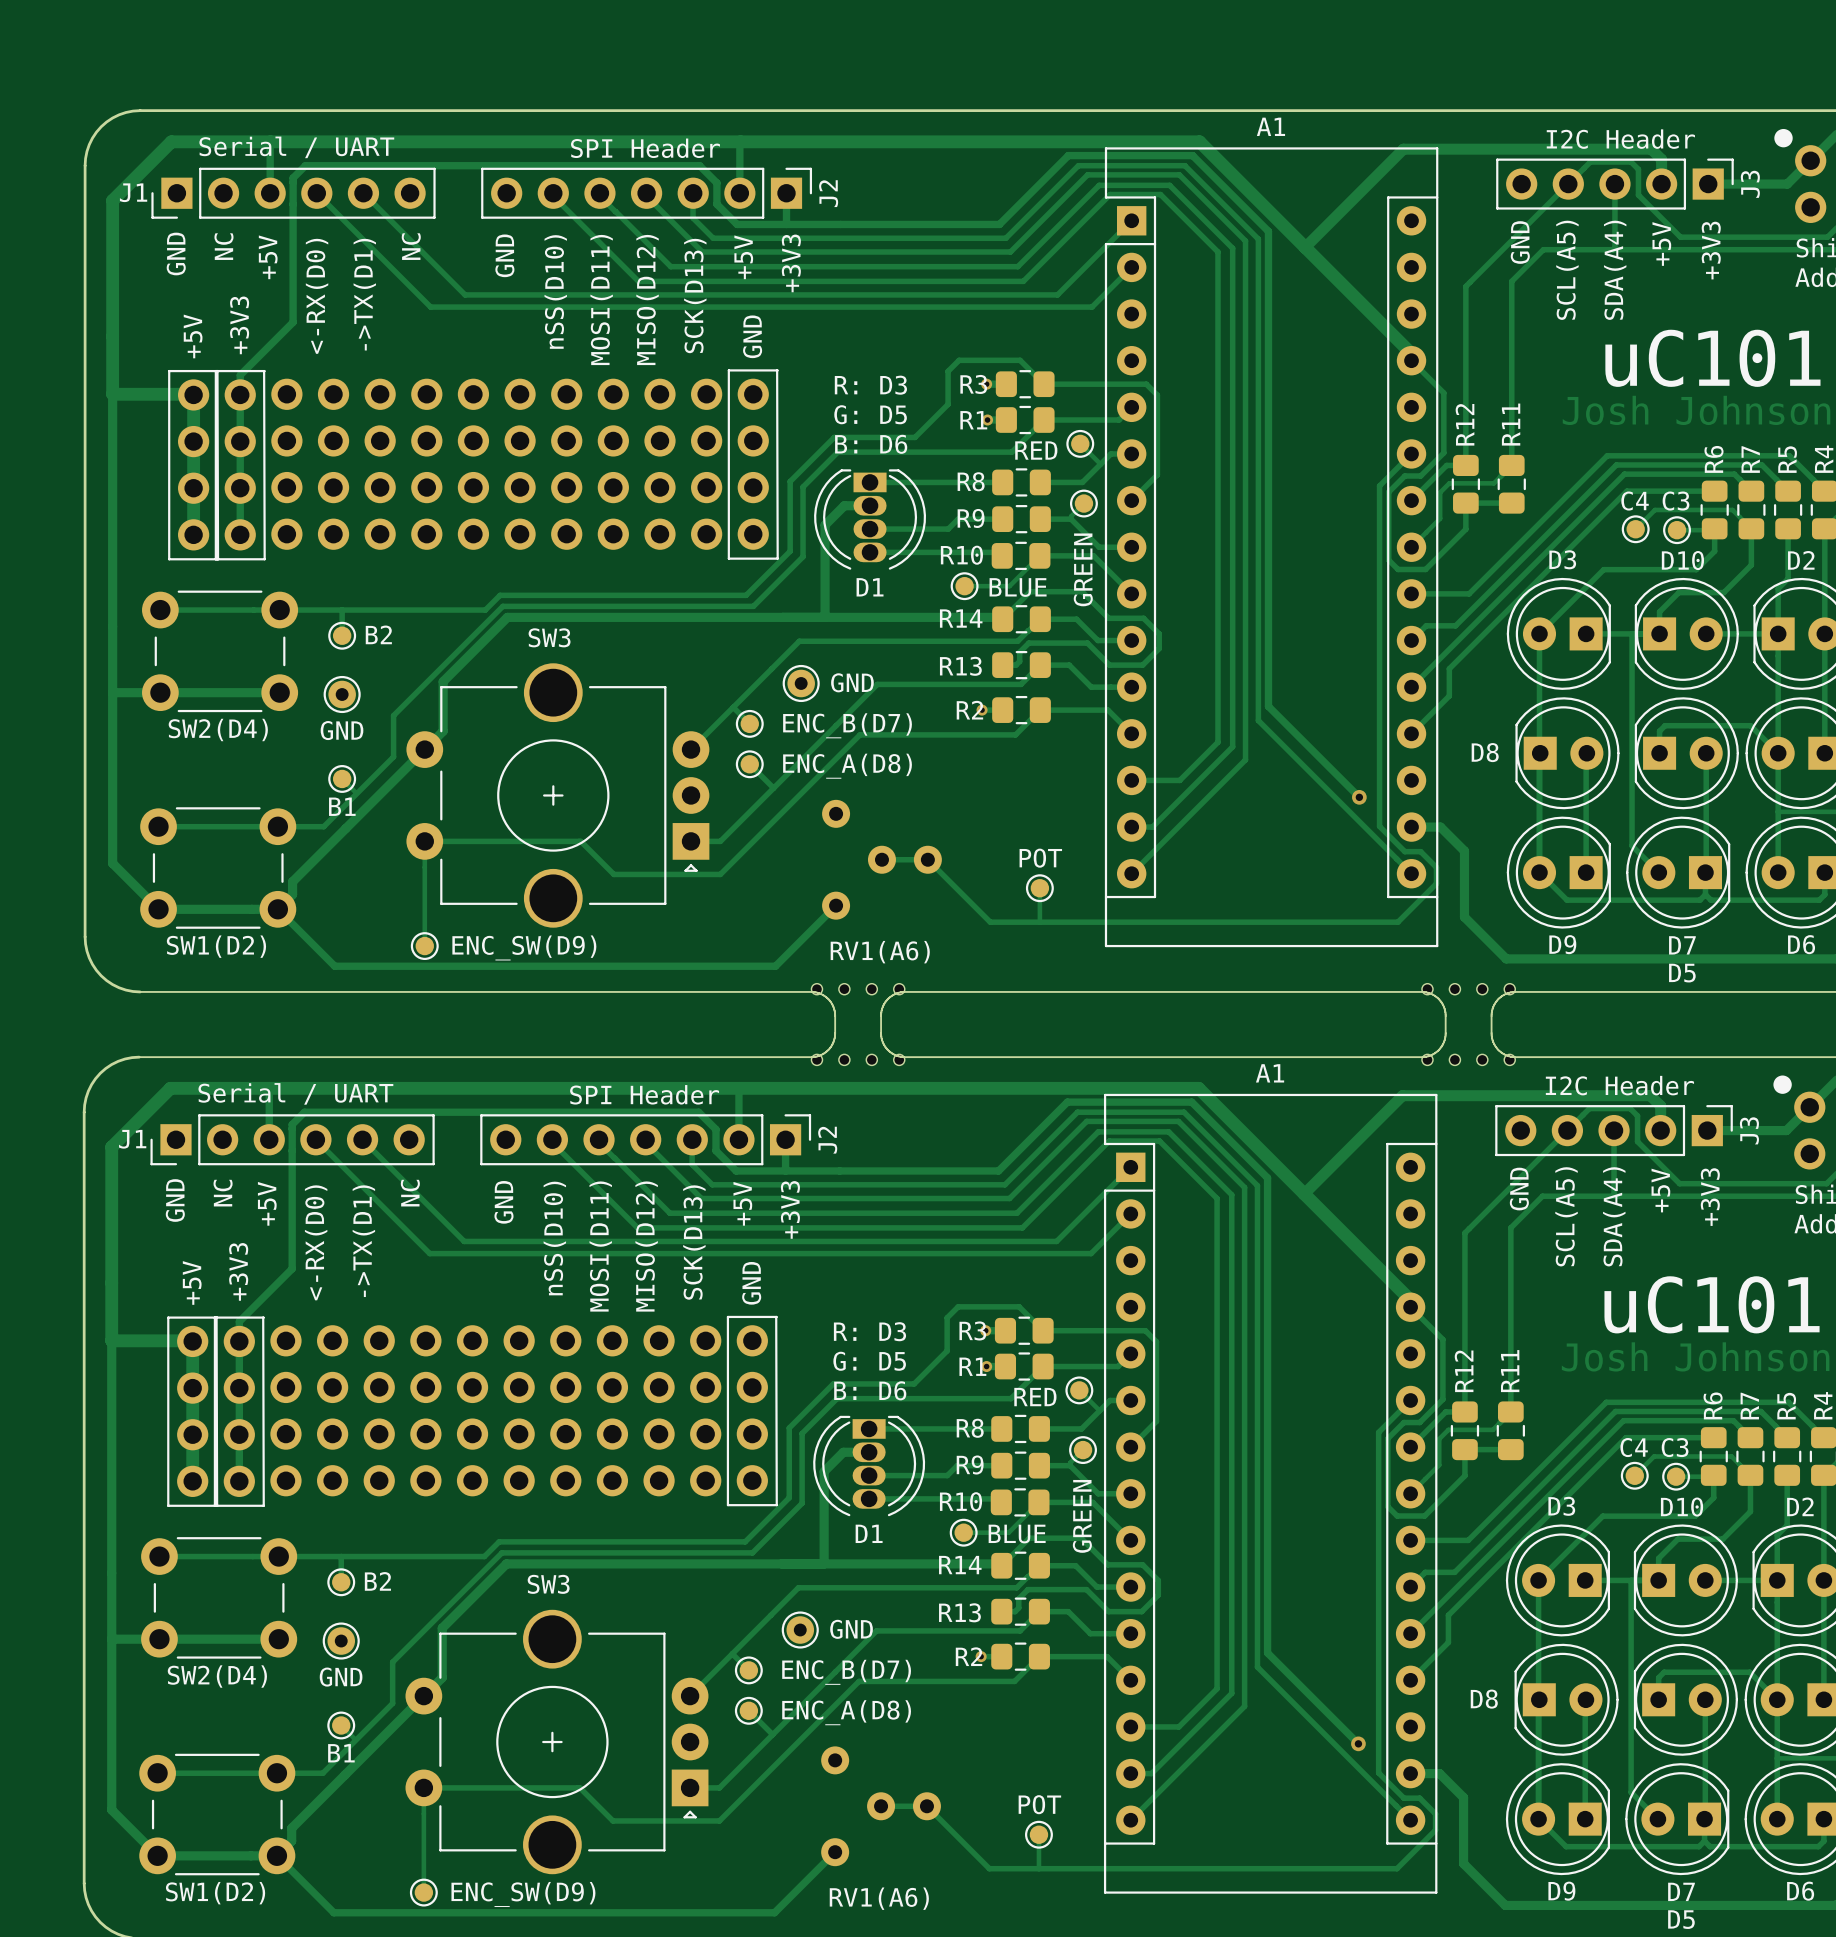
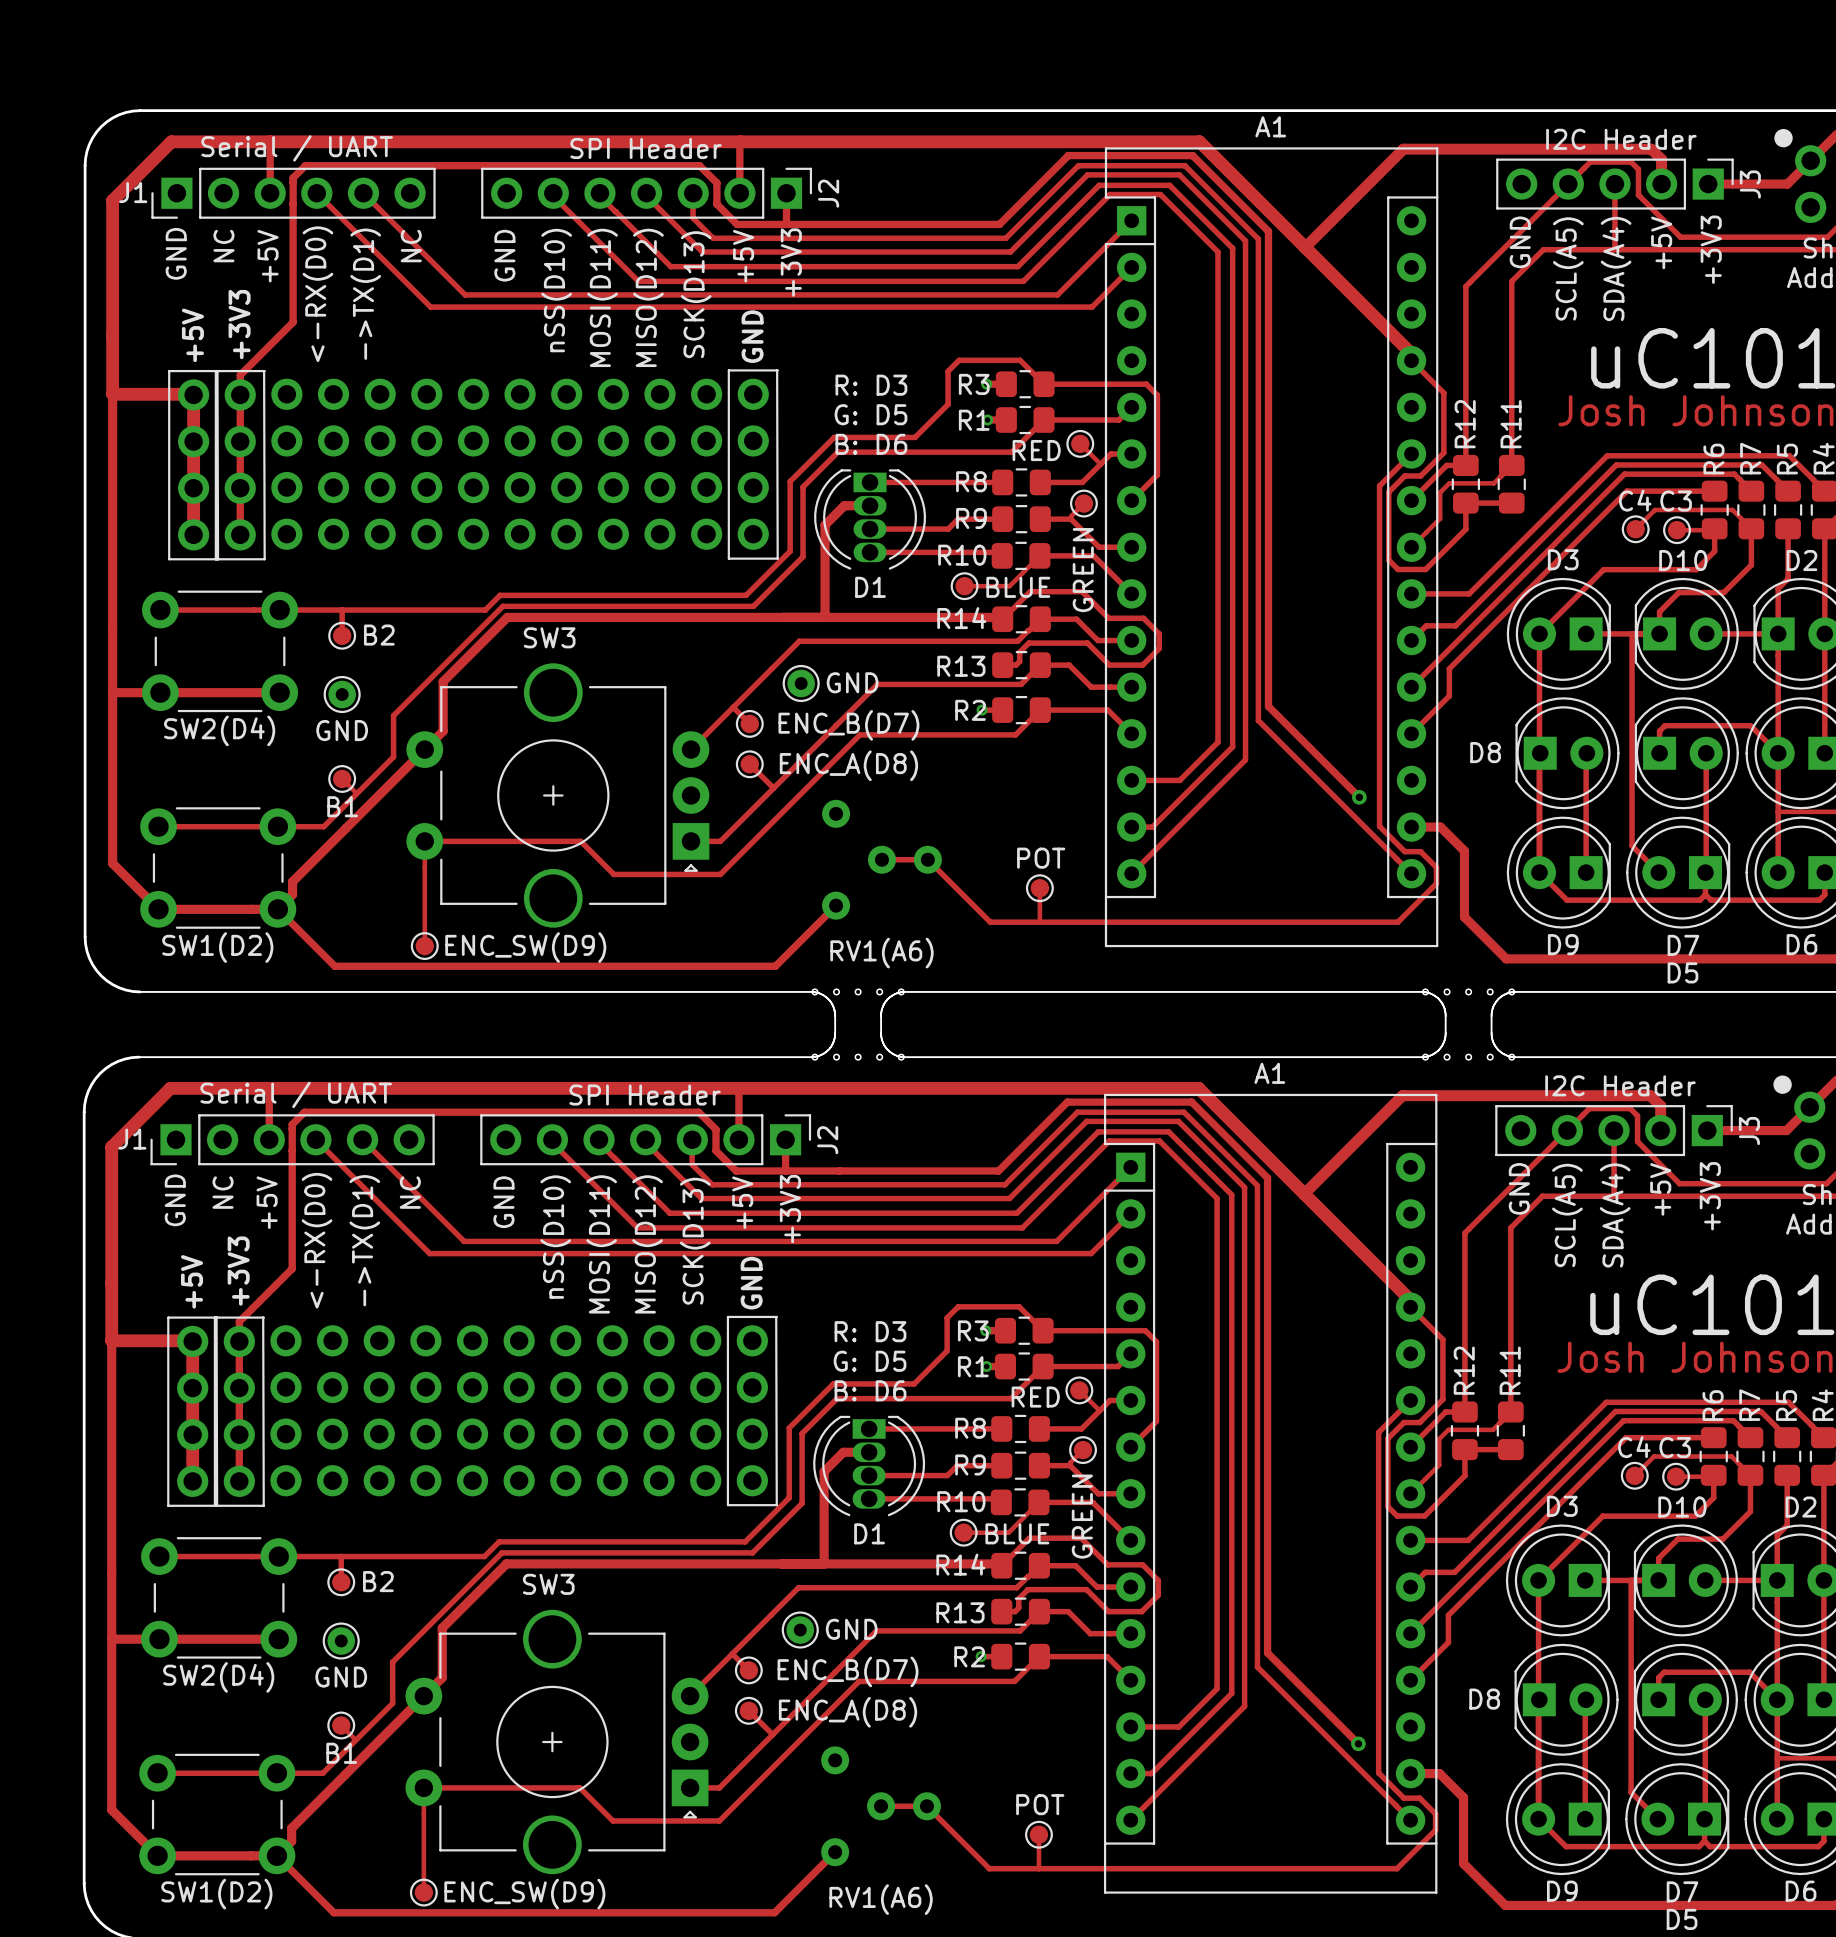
part footprint: [811, 983, 905, 995] -> [812, 989, 905, 995]
part footprint: [1421, 983, 1516, 995] -> [1422, 989, 1515, 995]
part footprint: [811, 1054, 905, 1066] -> [812, 1054, 905, 1060]
part footprint: [1421, 1054, 1516, 1066] -> [1422, 1054, 1515, 1060]

